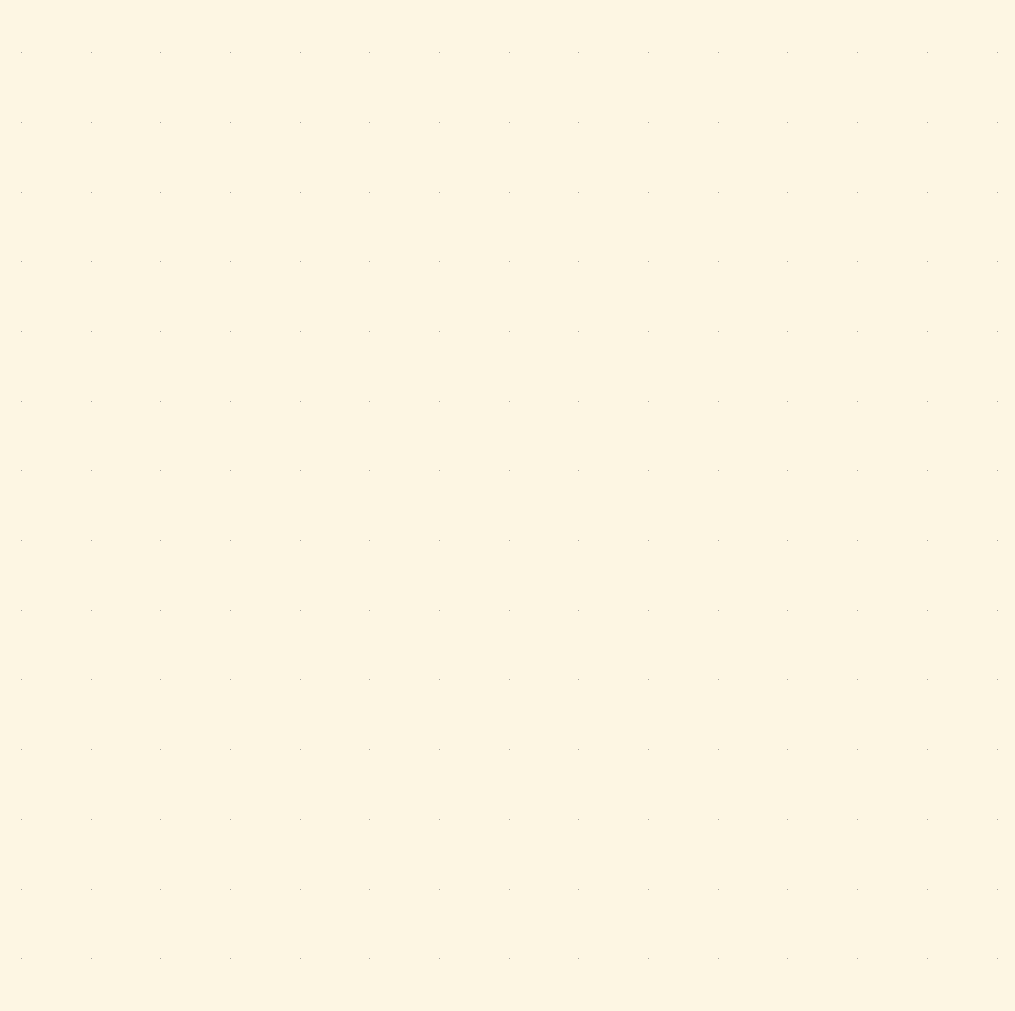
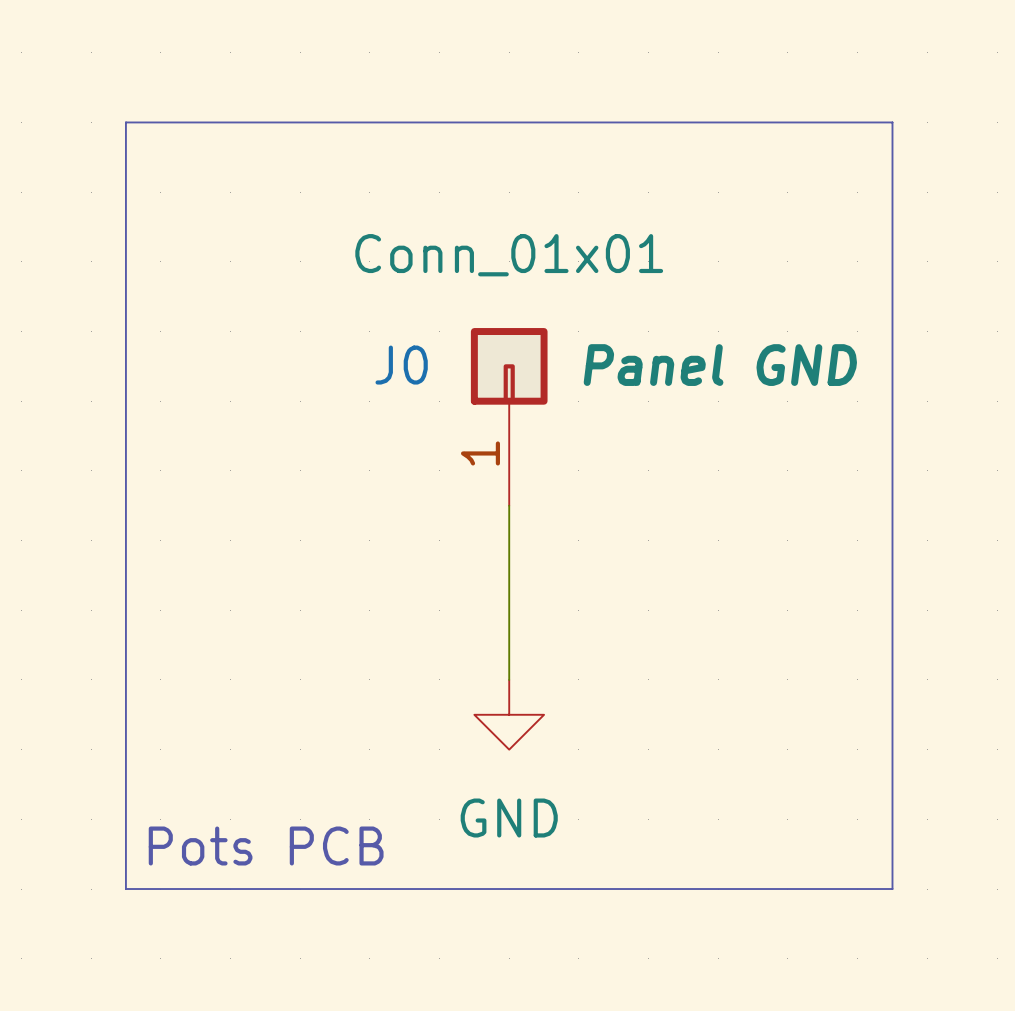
line: none -> (125, 122) (892, 122) (892, 889) (125, 889) (125, 122)
J0: none -> Conn_01x01 (509, 416)
wire: none -> (509, 505) (509, 679)
power symbol: none -> GND (509, 714)
text: none -> Pots PCB (266, 846)

